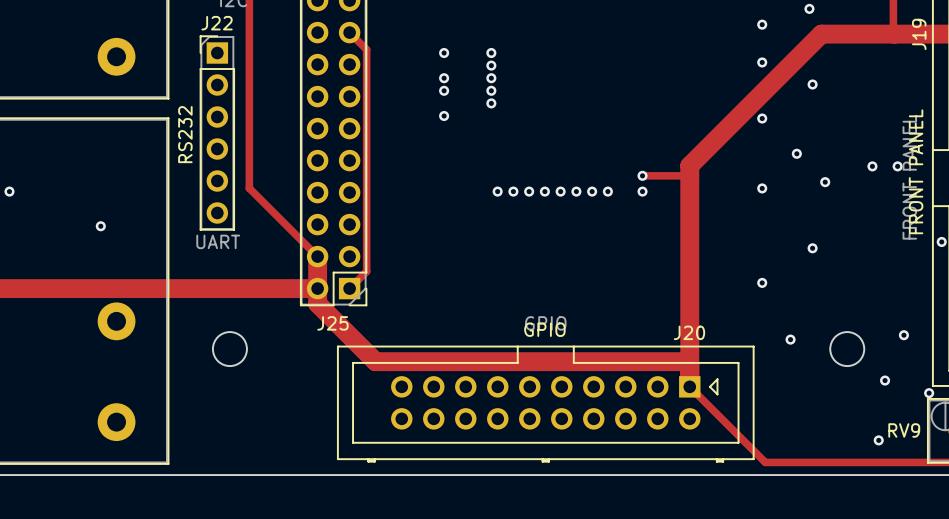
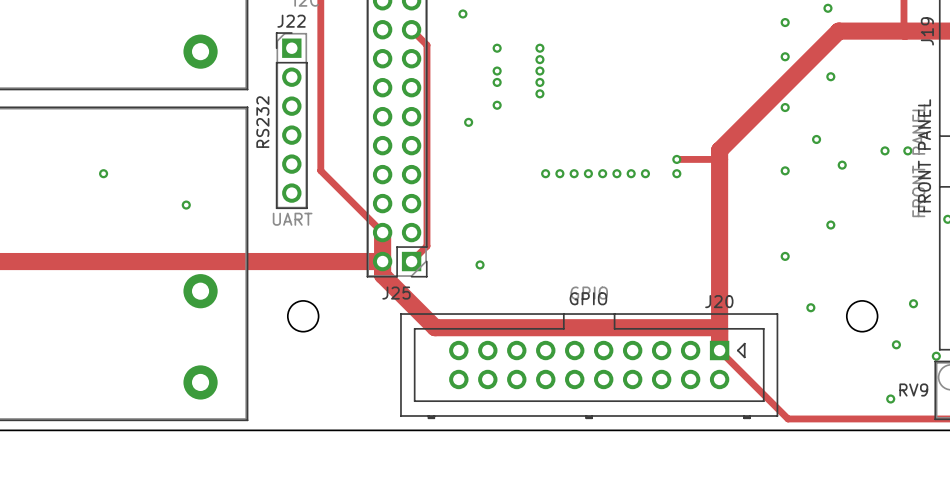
via: none -> (462, 13)
via: none -> (468, 122)
via: none -> (480, 264)

